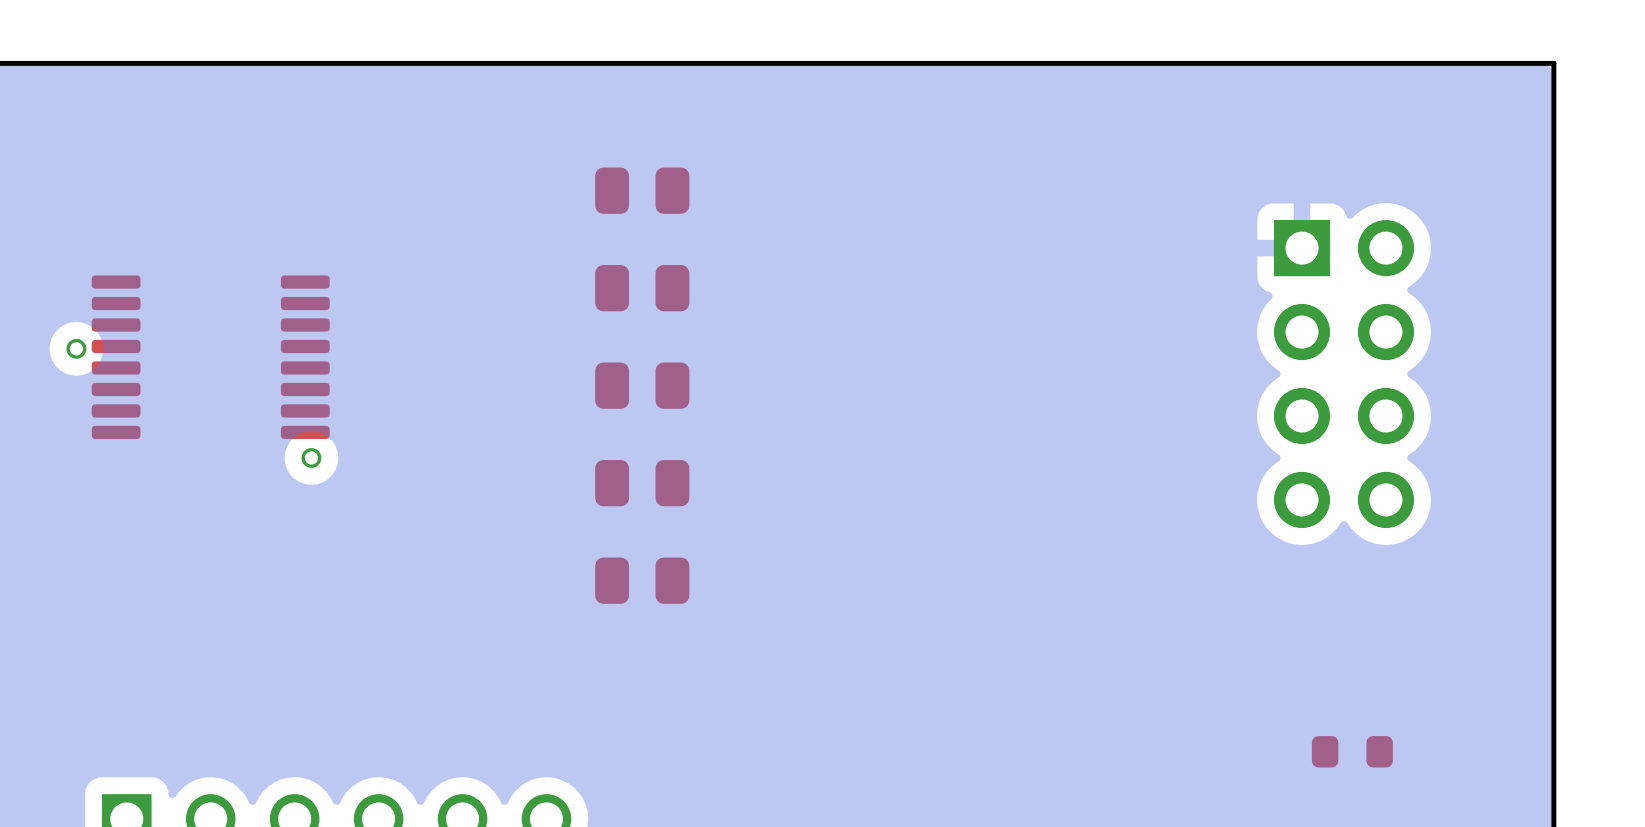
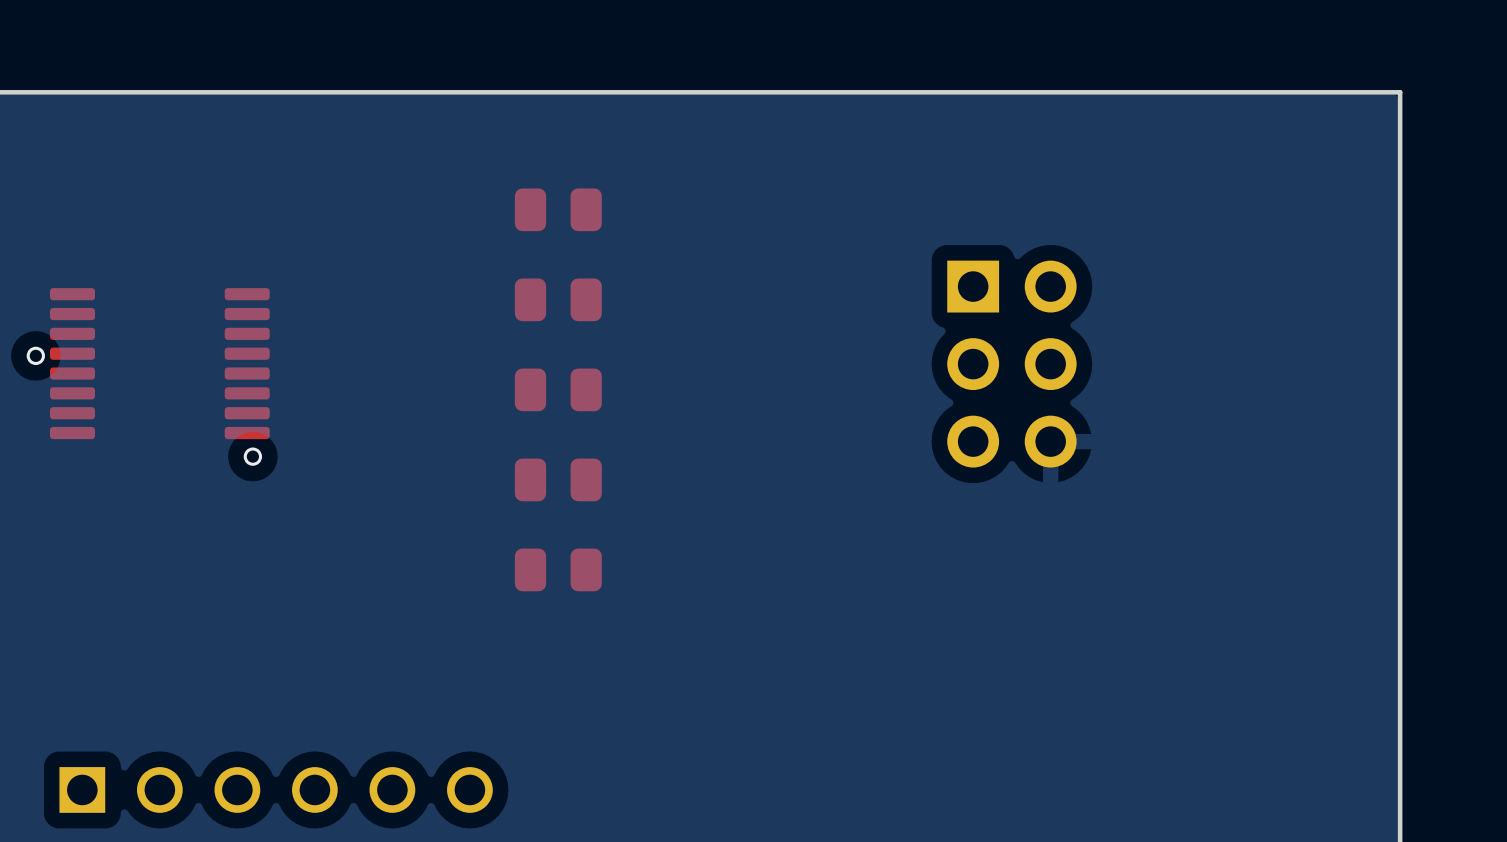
part: none -> (1011, 364)
part: (1343, 374) -> none
part: (1352, 751) -> none

